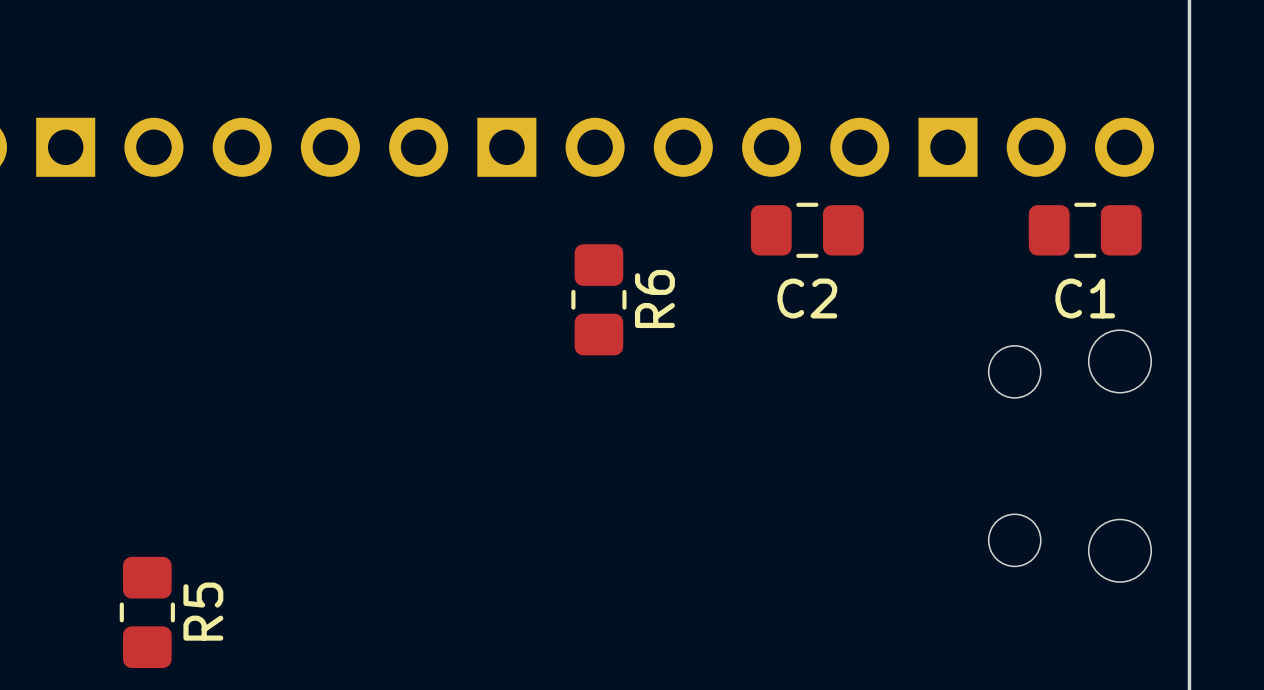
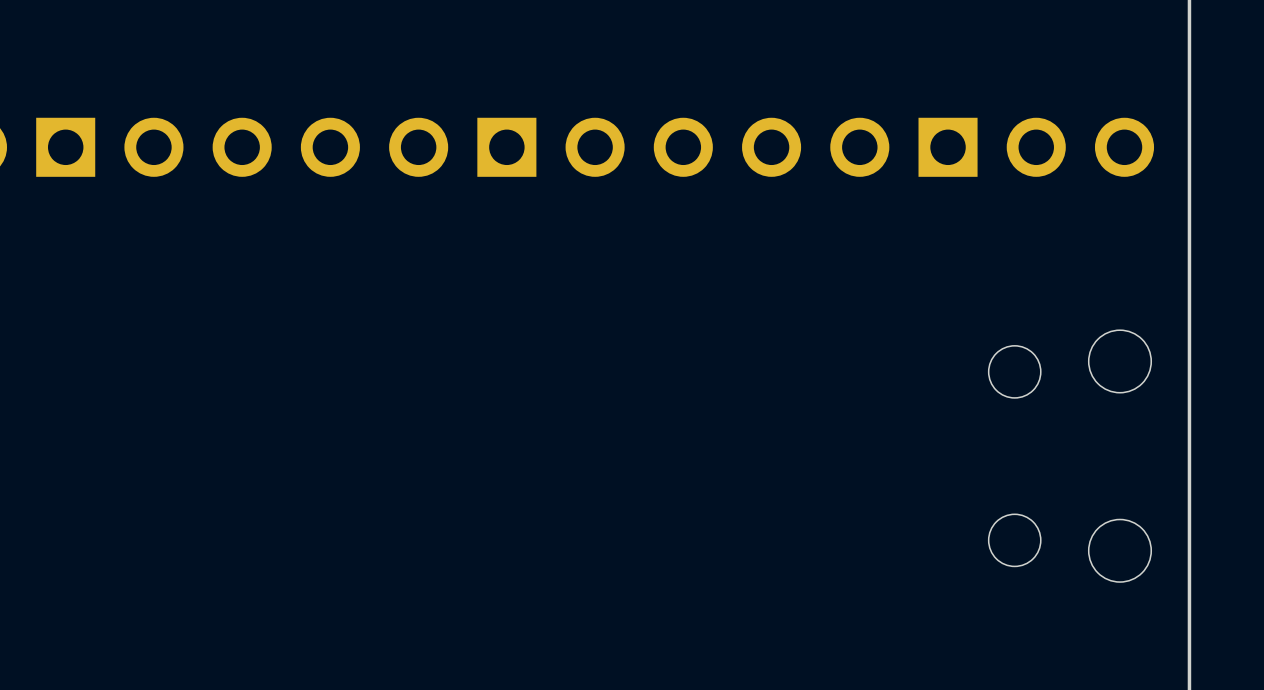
C2: (807, 230) -> none
C1: (1085, 230) -> none
R6: (598, 299) -> none
R5: (147, 612) -> none

